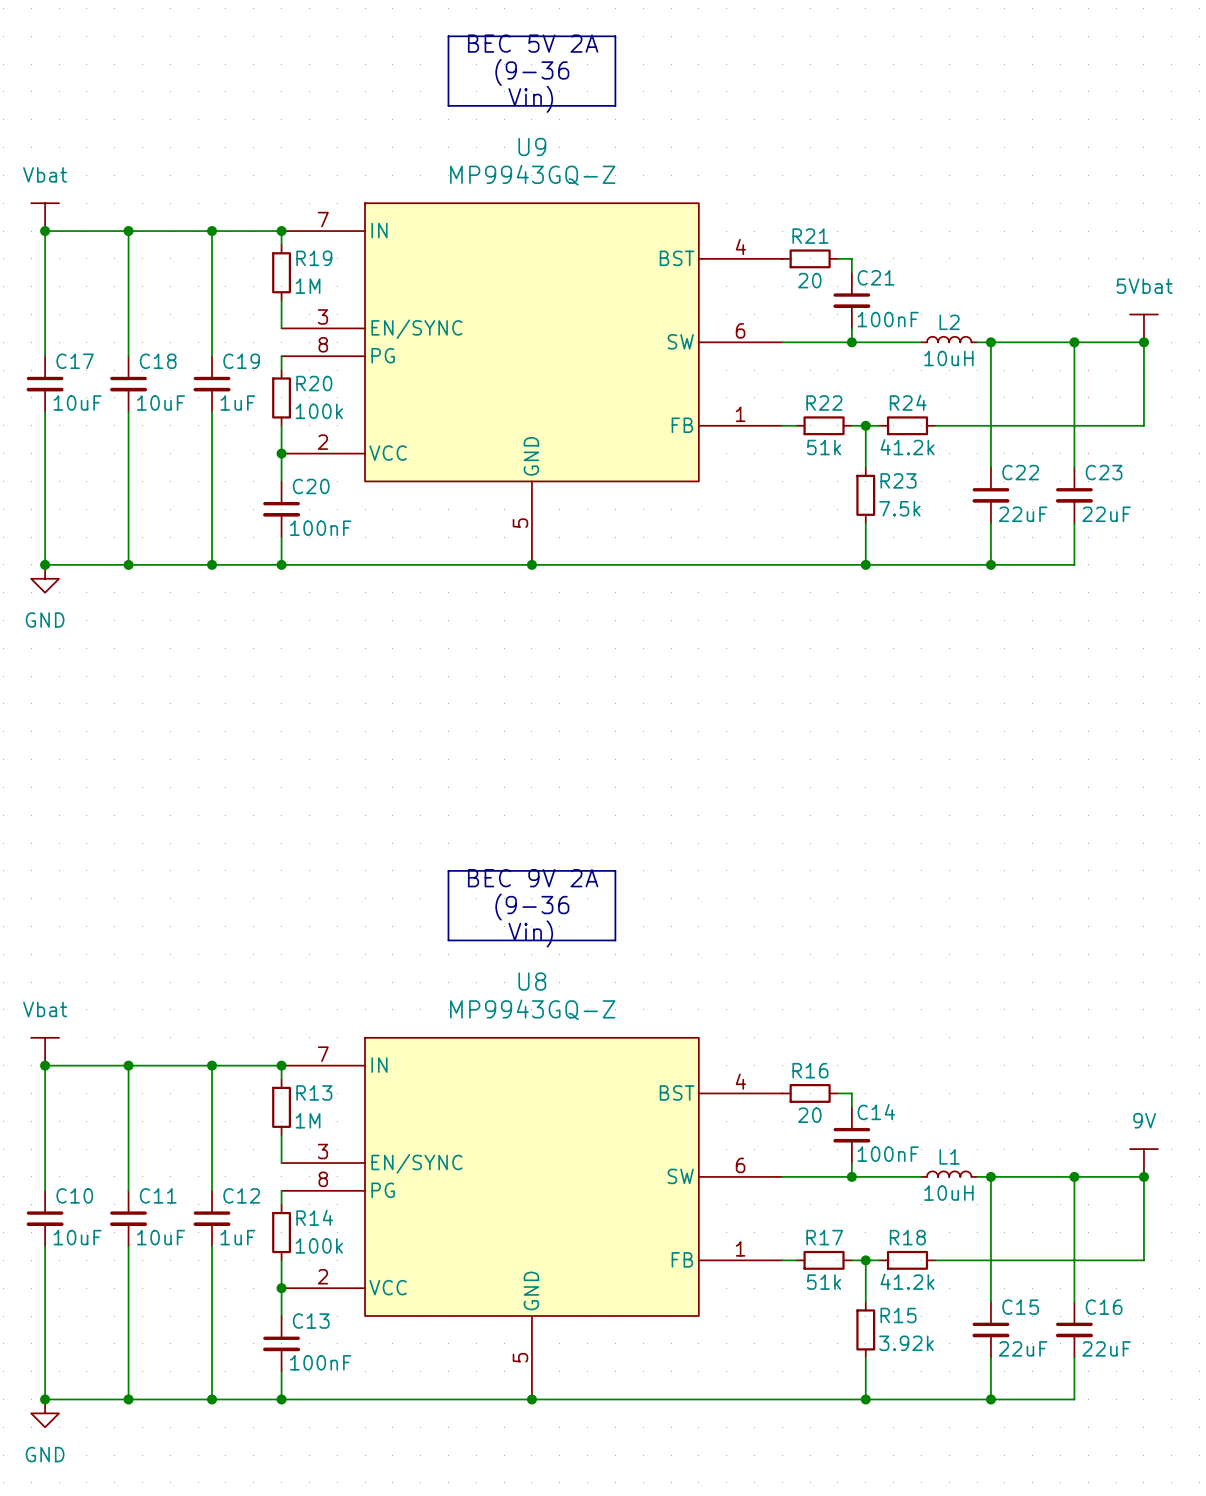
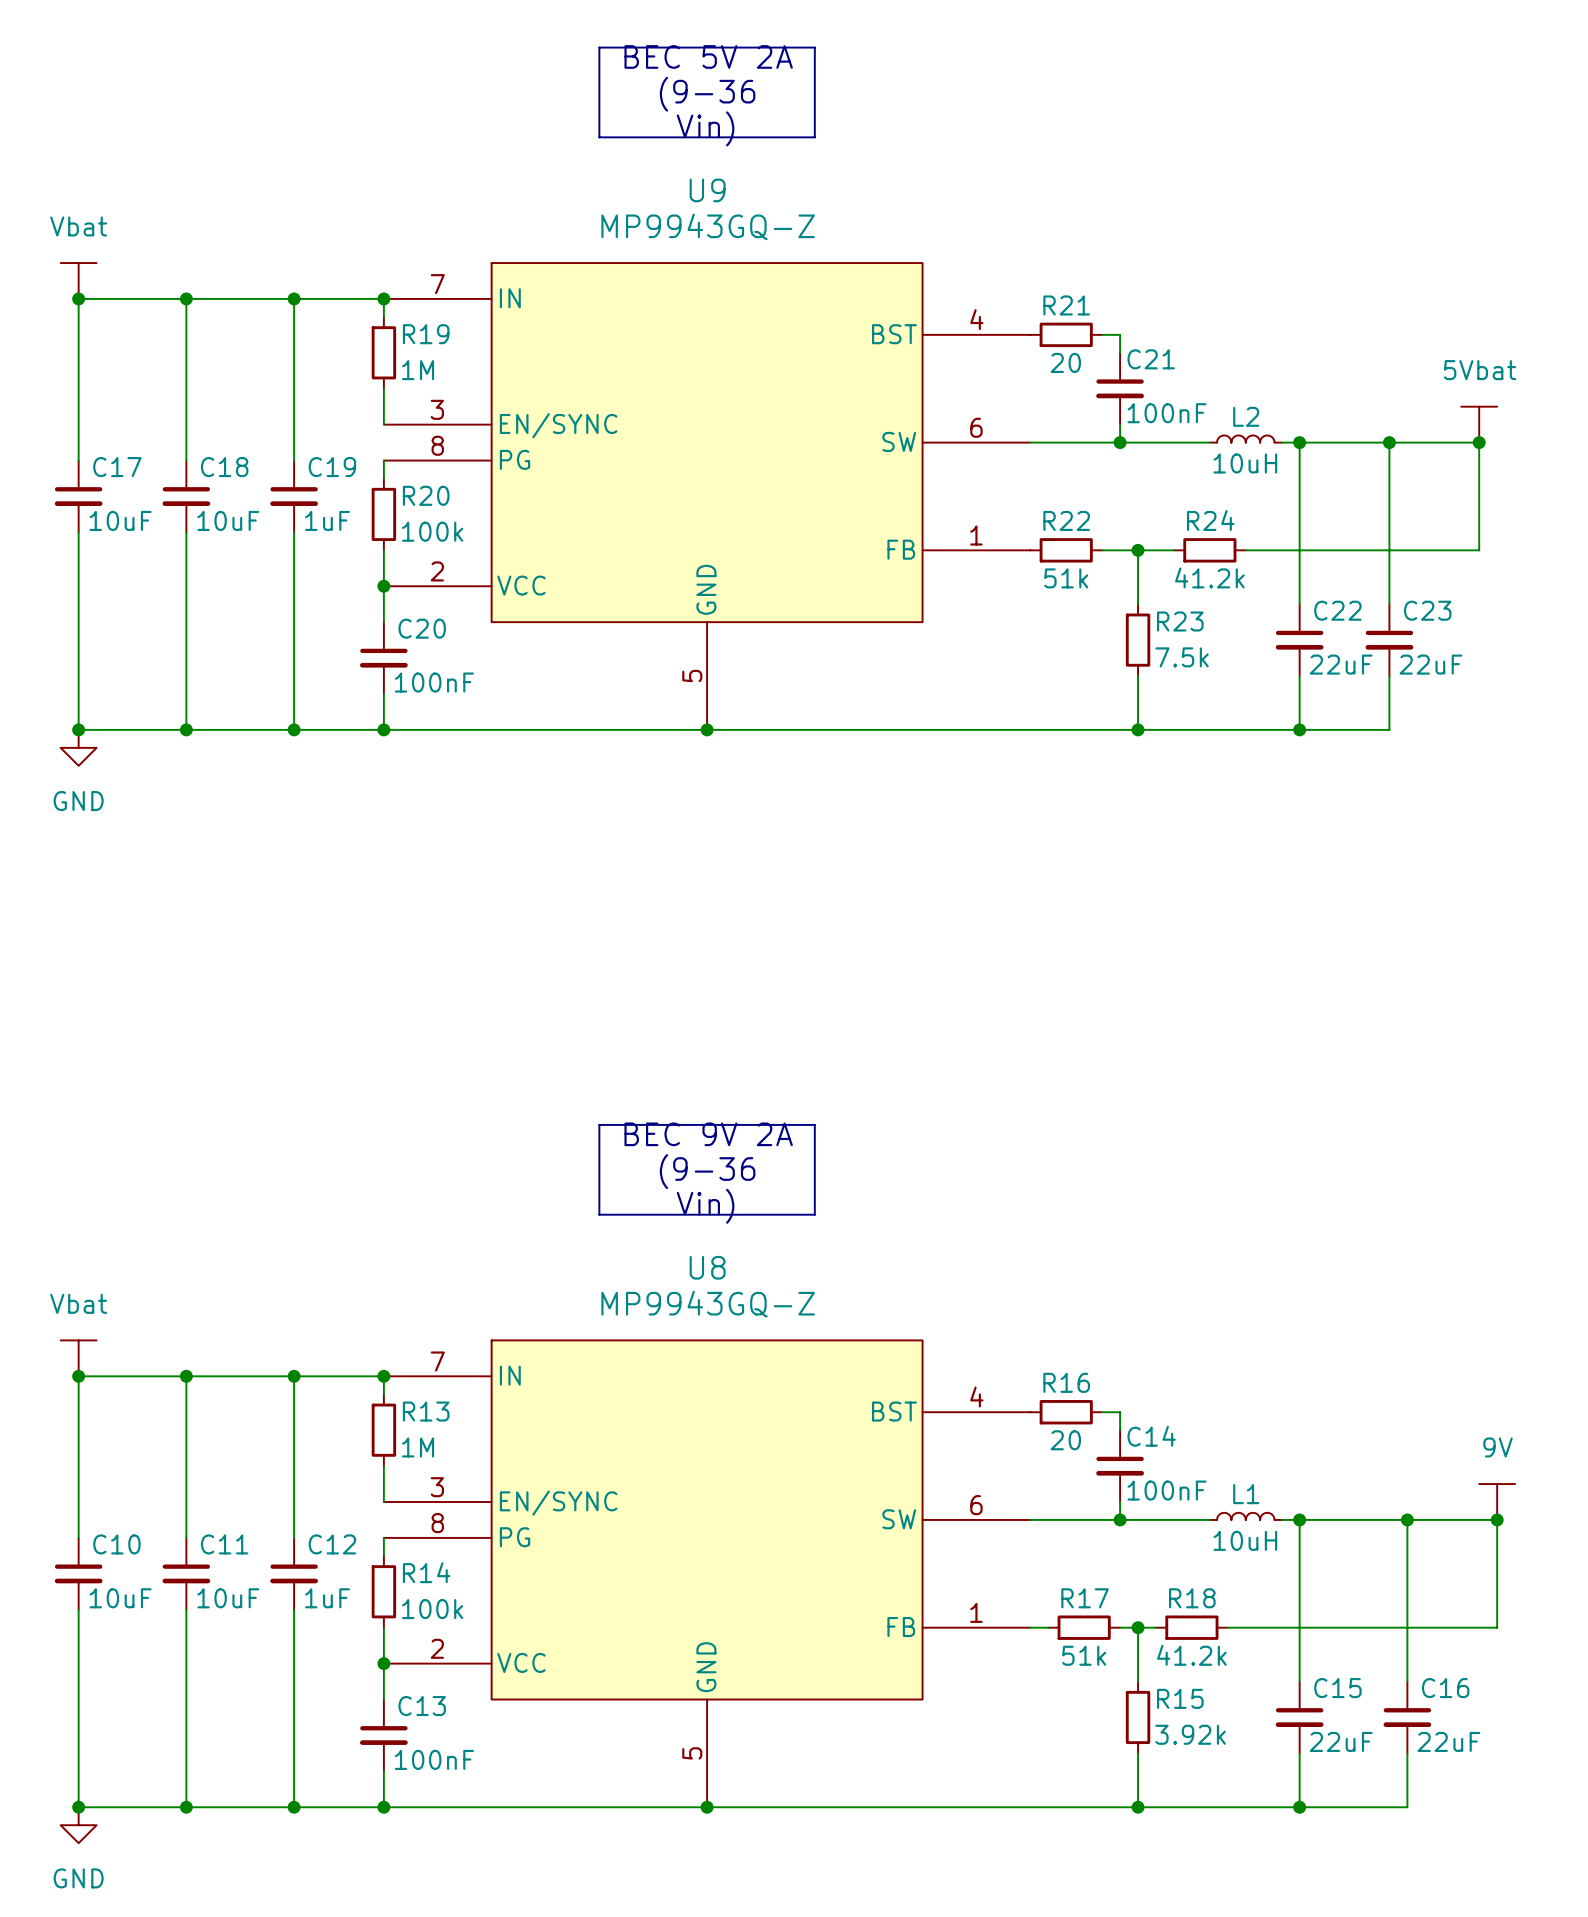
power symbol position: 5Vbat (1143, 328) -> 5Vbat (1479, 424)
wire: (1074, 342) (1074, 467) -> (1389, 442) (1389, 604)
junction position: (1074, 342) -> (1389, 442)
wire: (1130, 342) (1143, 342) (1143, 425) (1130, 425) -> (1479, 442) (1479, 550)
junction position: (1143, 342) -> (1479, 442)
R22 position: (824, 425) -> (1066, 550)
R24 position: (907, 425) -> (1209, 550)
C23 position: (1074, 495) -> (1389, 640)
wire: (1074, 523) (1074, 564) (1060, 564) -> (1389, 676) (1389, 729)

